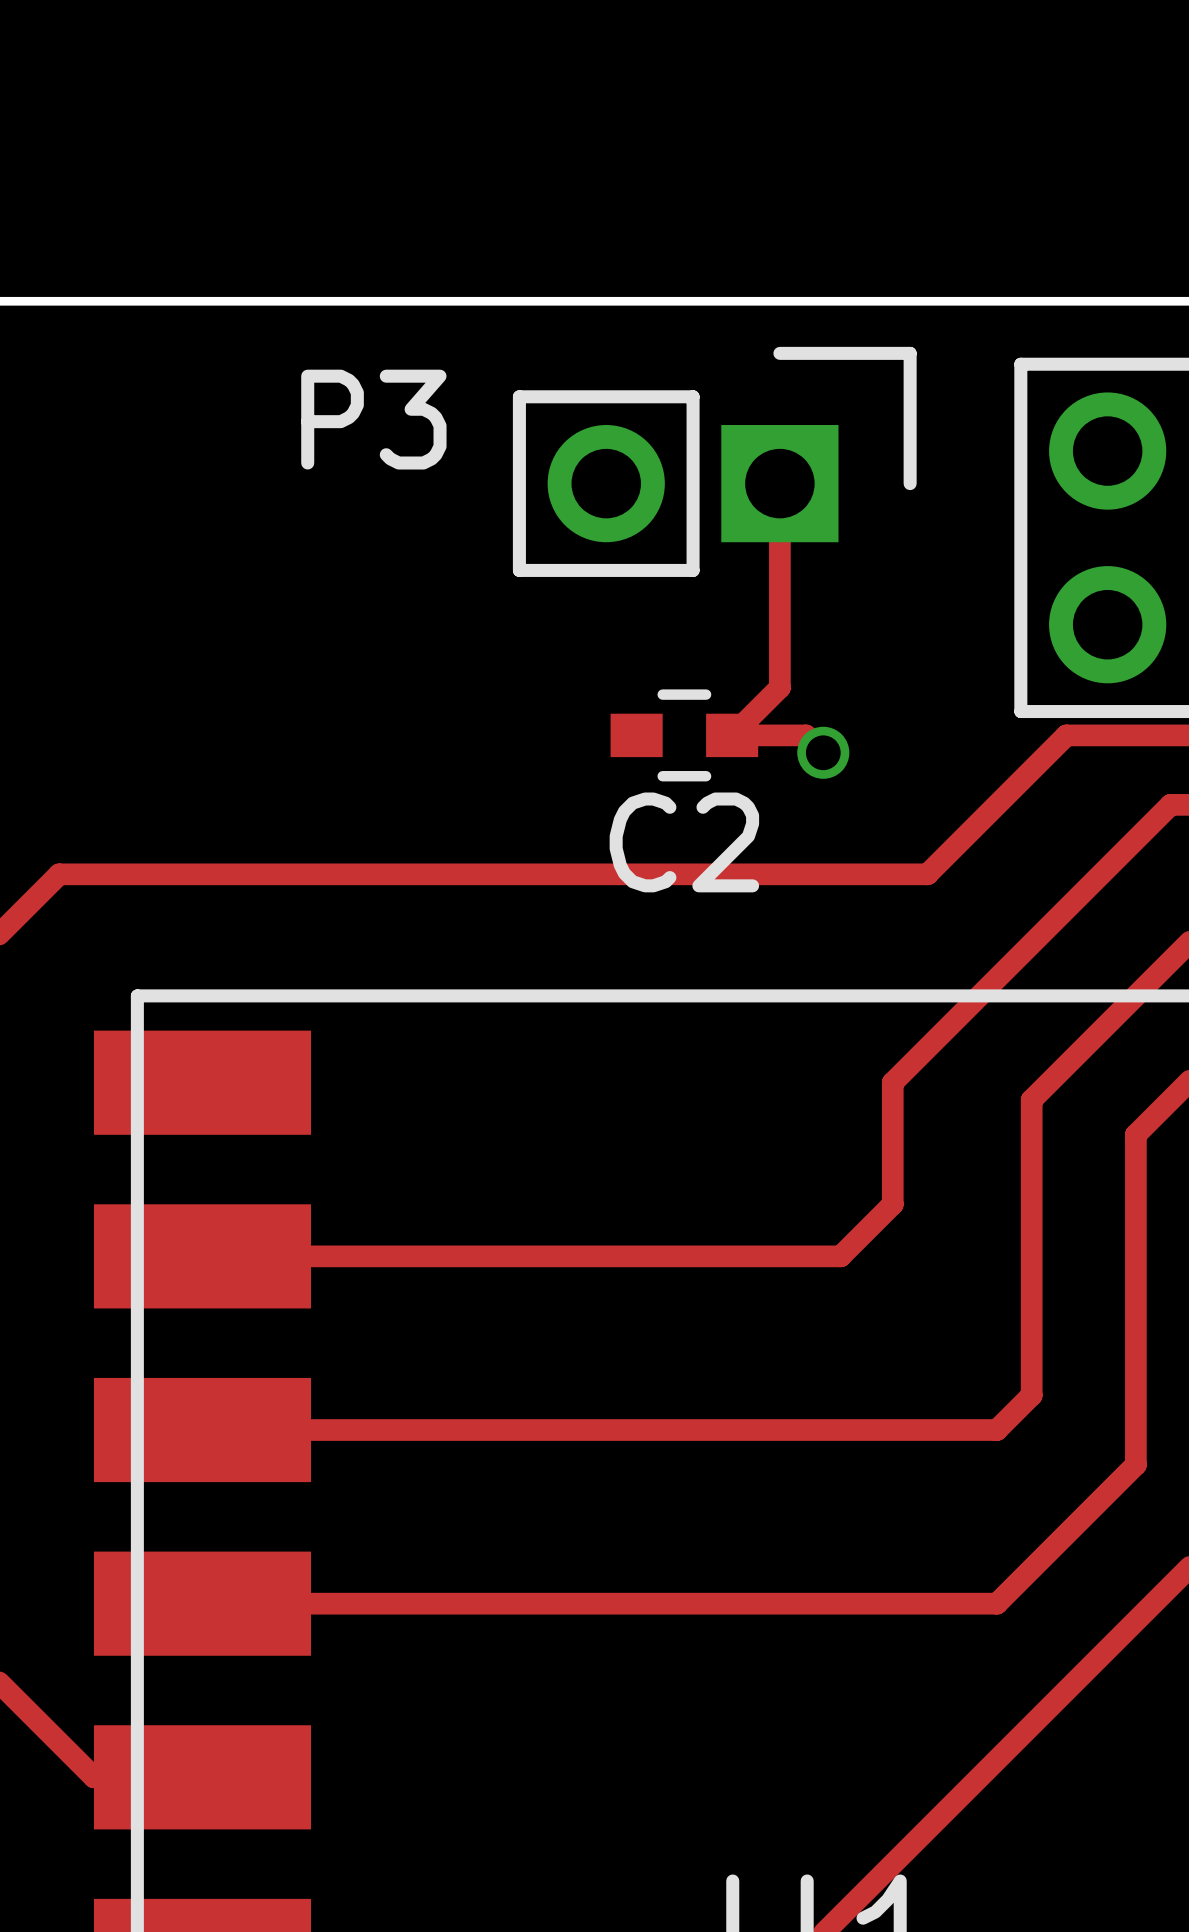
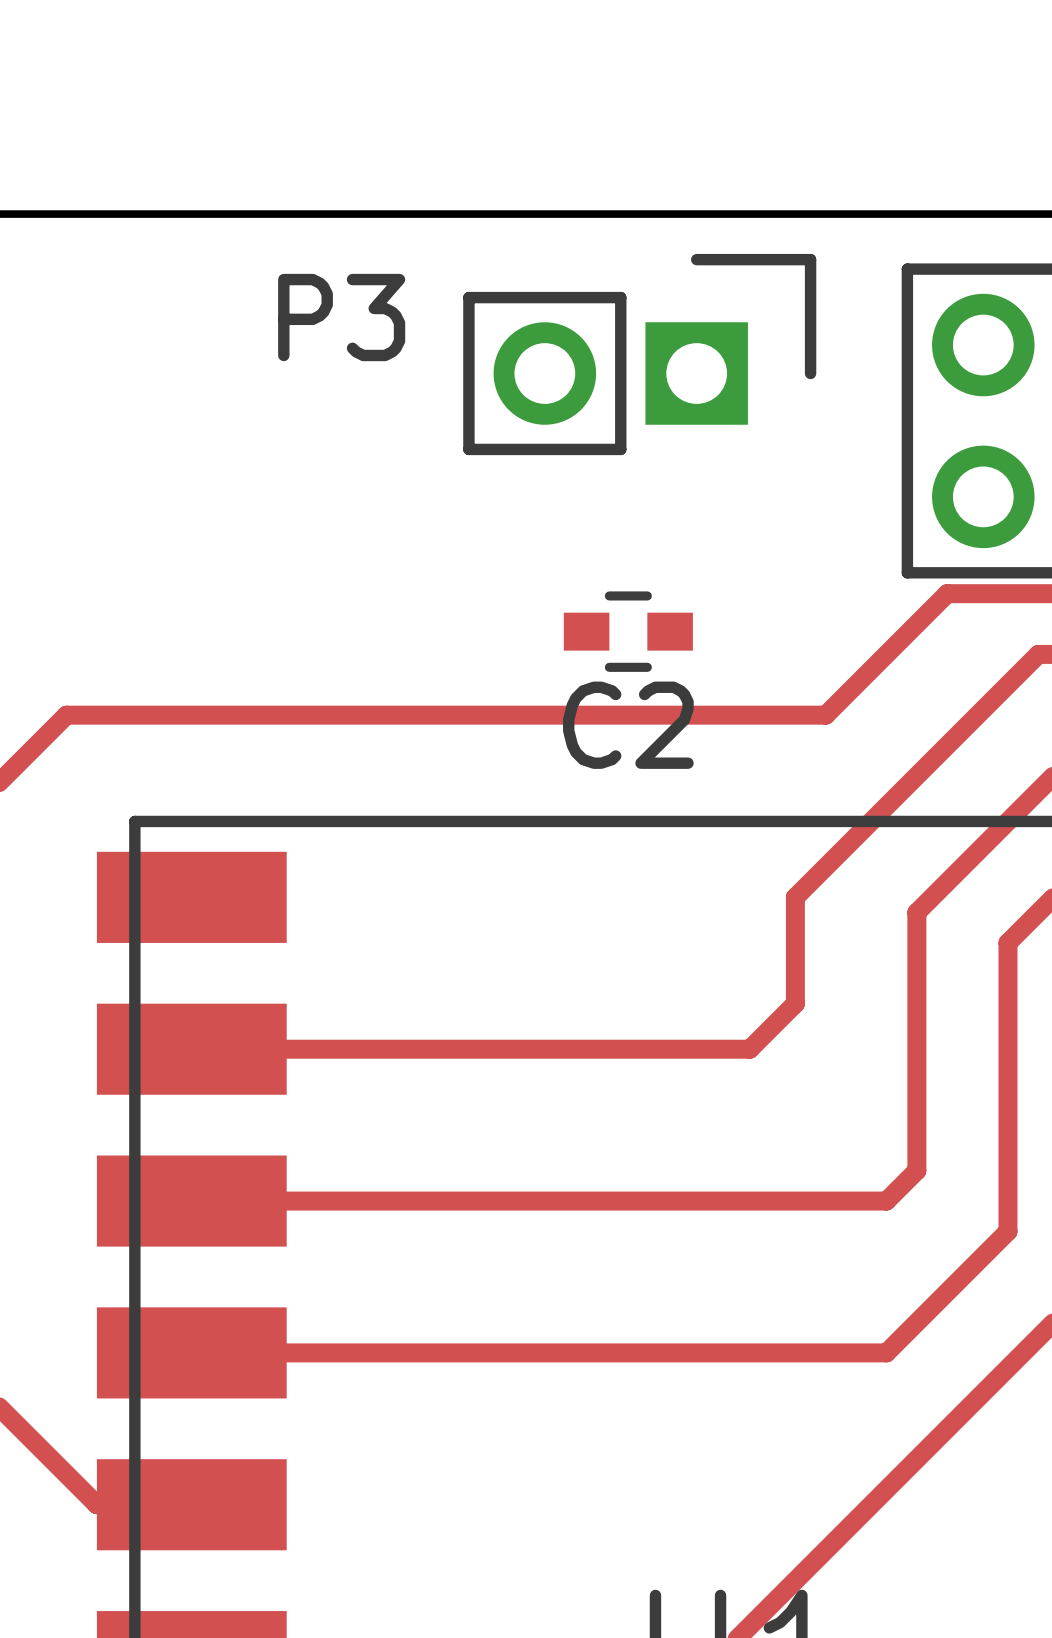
track: (779, 483) (779, 687) (732, 735) (805, 735) (823, 752) -> none
C2 position: (684, 735) -> (628, 631)
via: (823, 752) -> none

